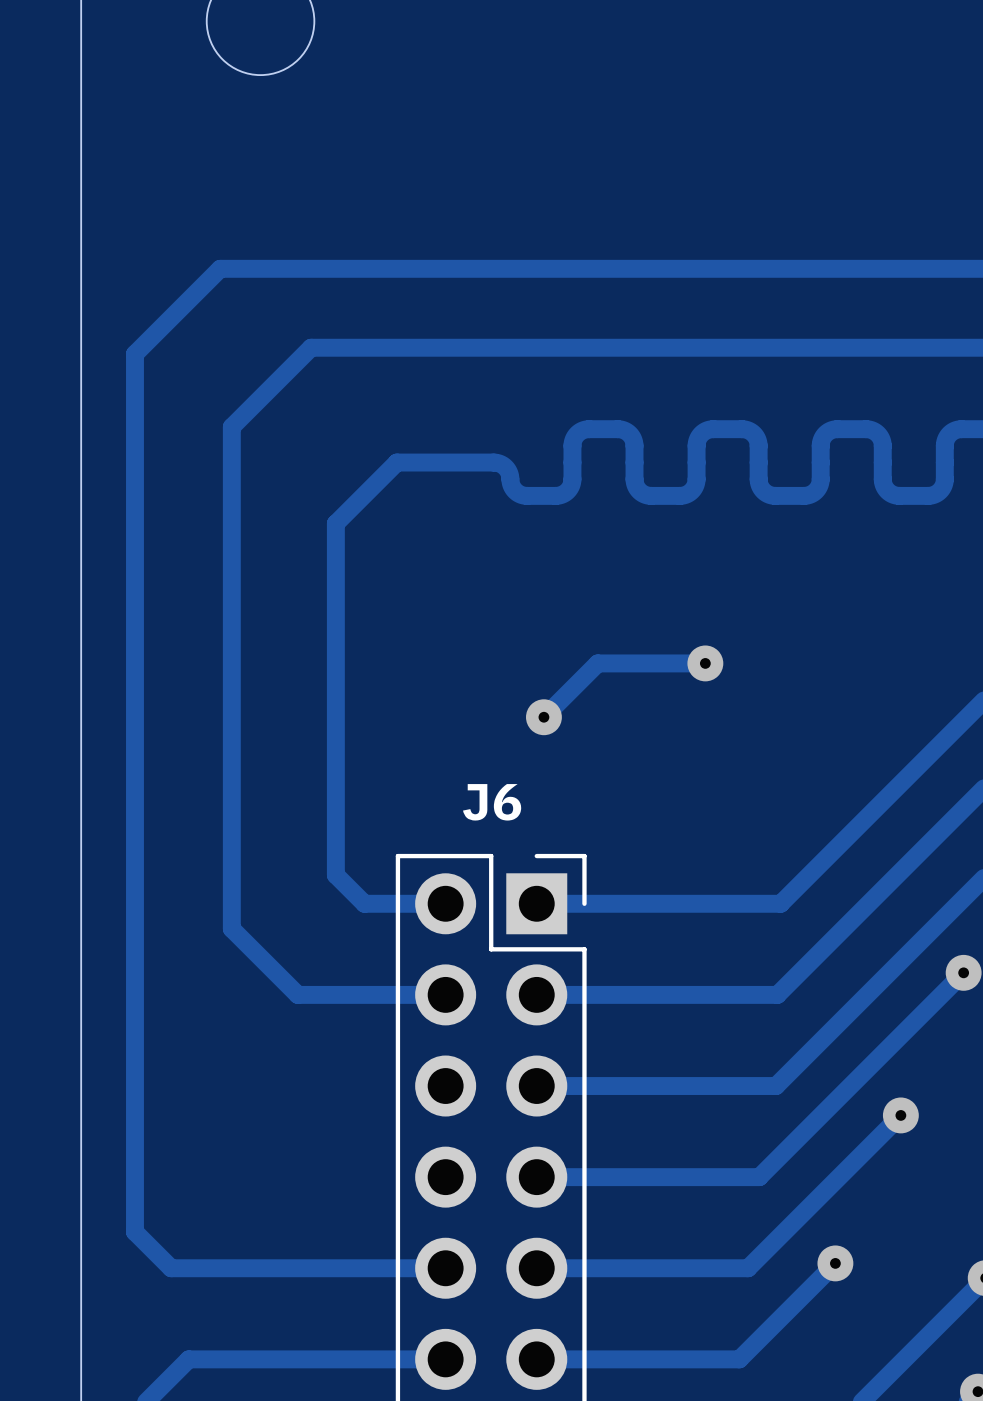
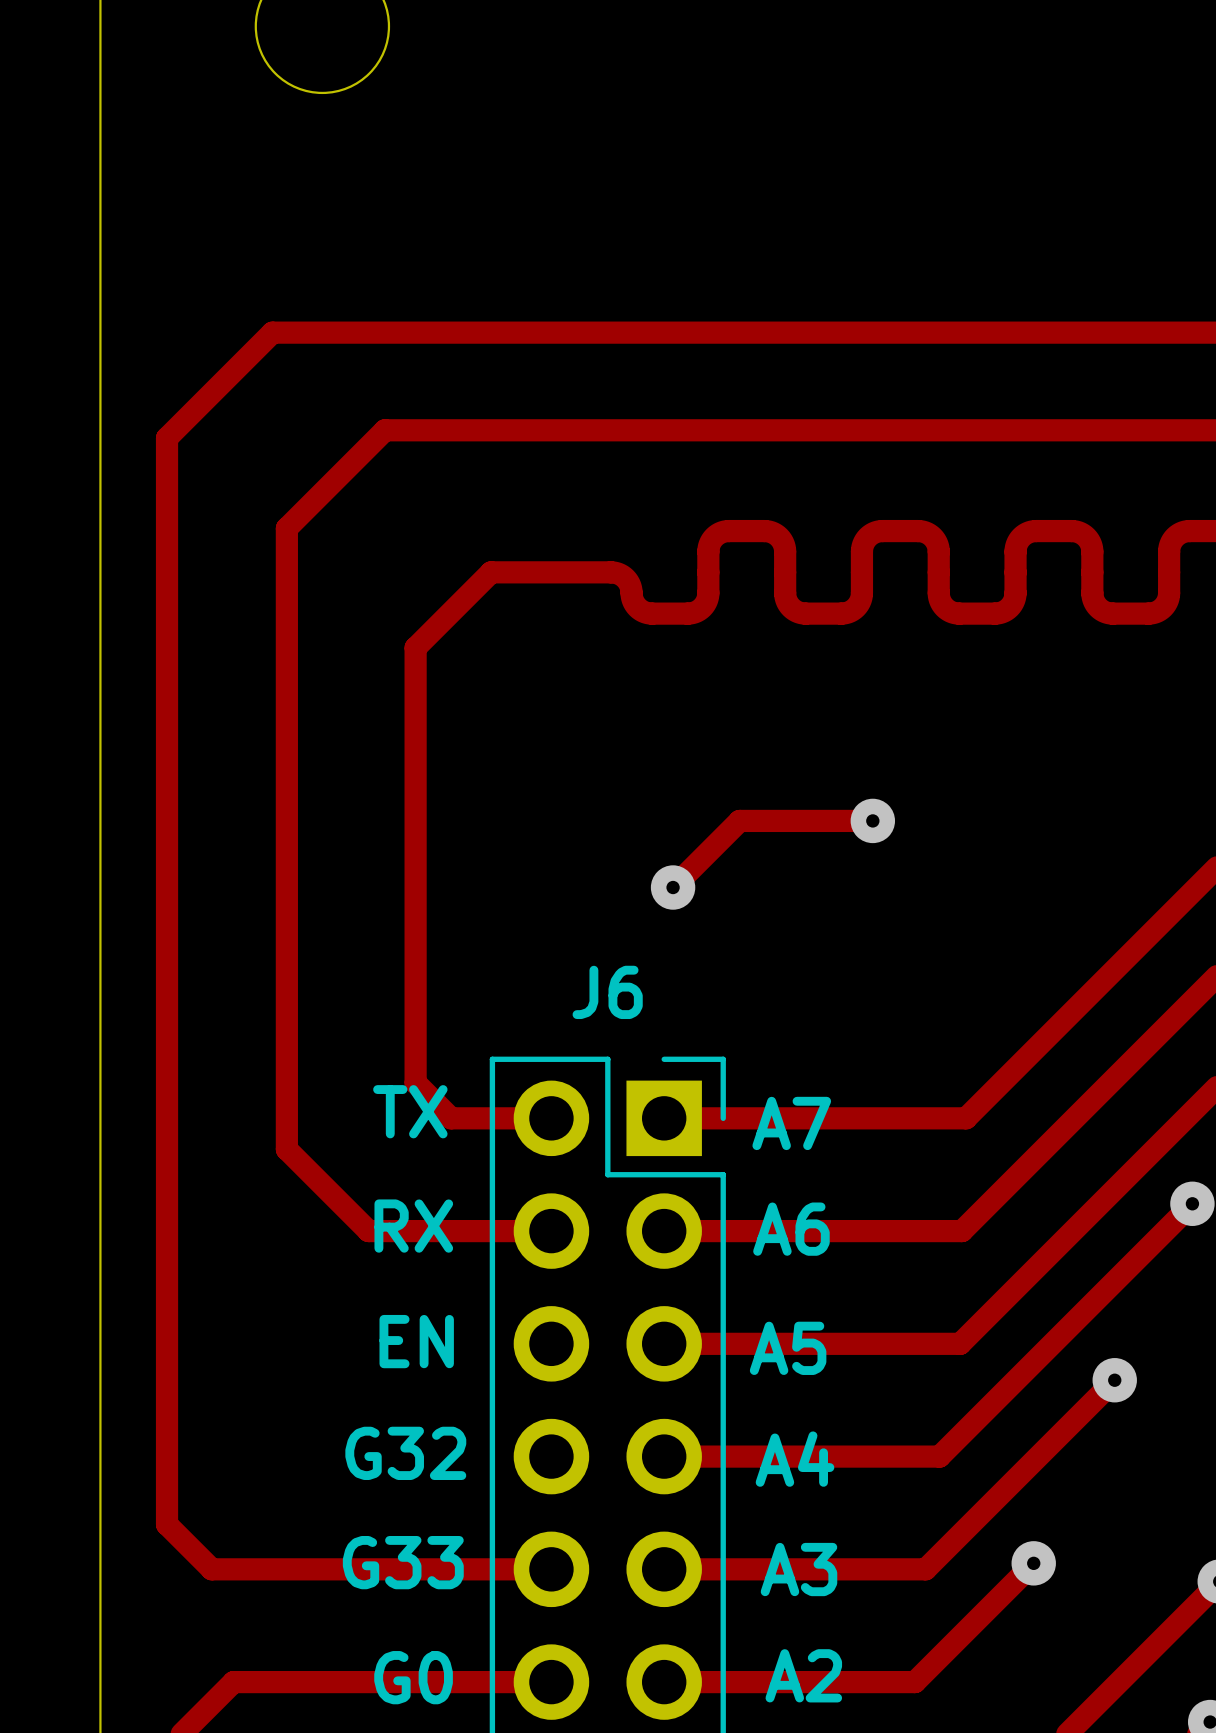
text: none -> TX (410, 1111)
text: none -> A7 (791, 1123)
text: none -> RX (413, 1226)
text: none -> A6 (791, 1229)
text: none -> EN (416, 1341)
text: none -> A5 (788, 1348)
text: none -> G32 (405, 1453)
text: none -> A4 (795, 1459)
text: none -> G33 (403, 1562)
text: none -> A3 (798, 1569)
text: none -> A2 (803, 1675)
text: none -> G0 (413, 1677)

